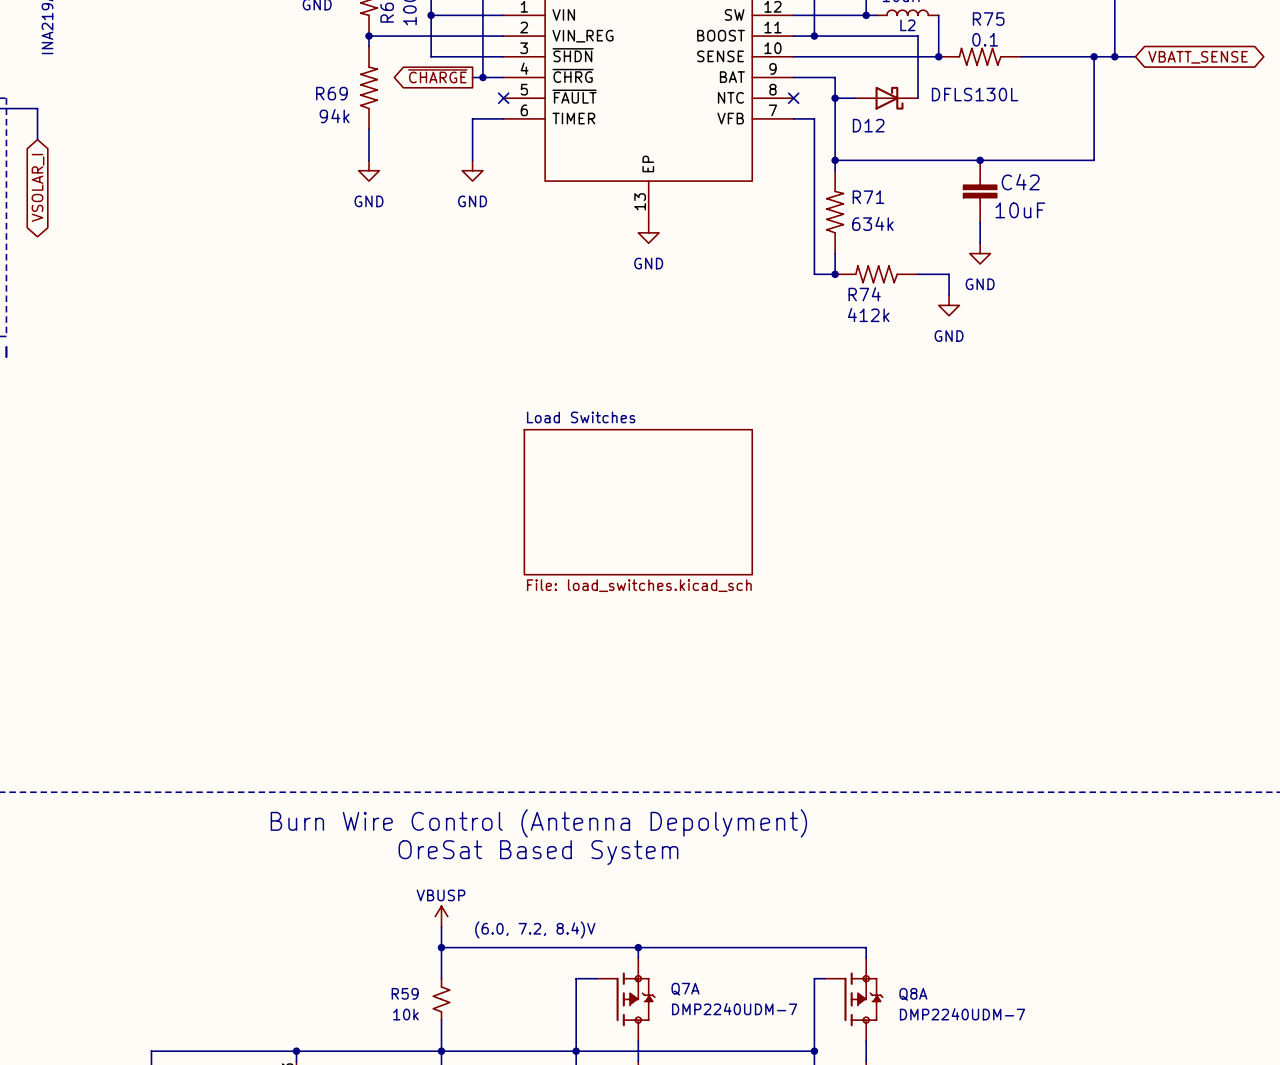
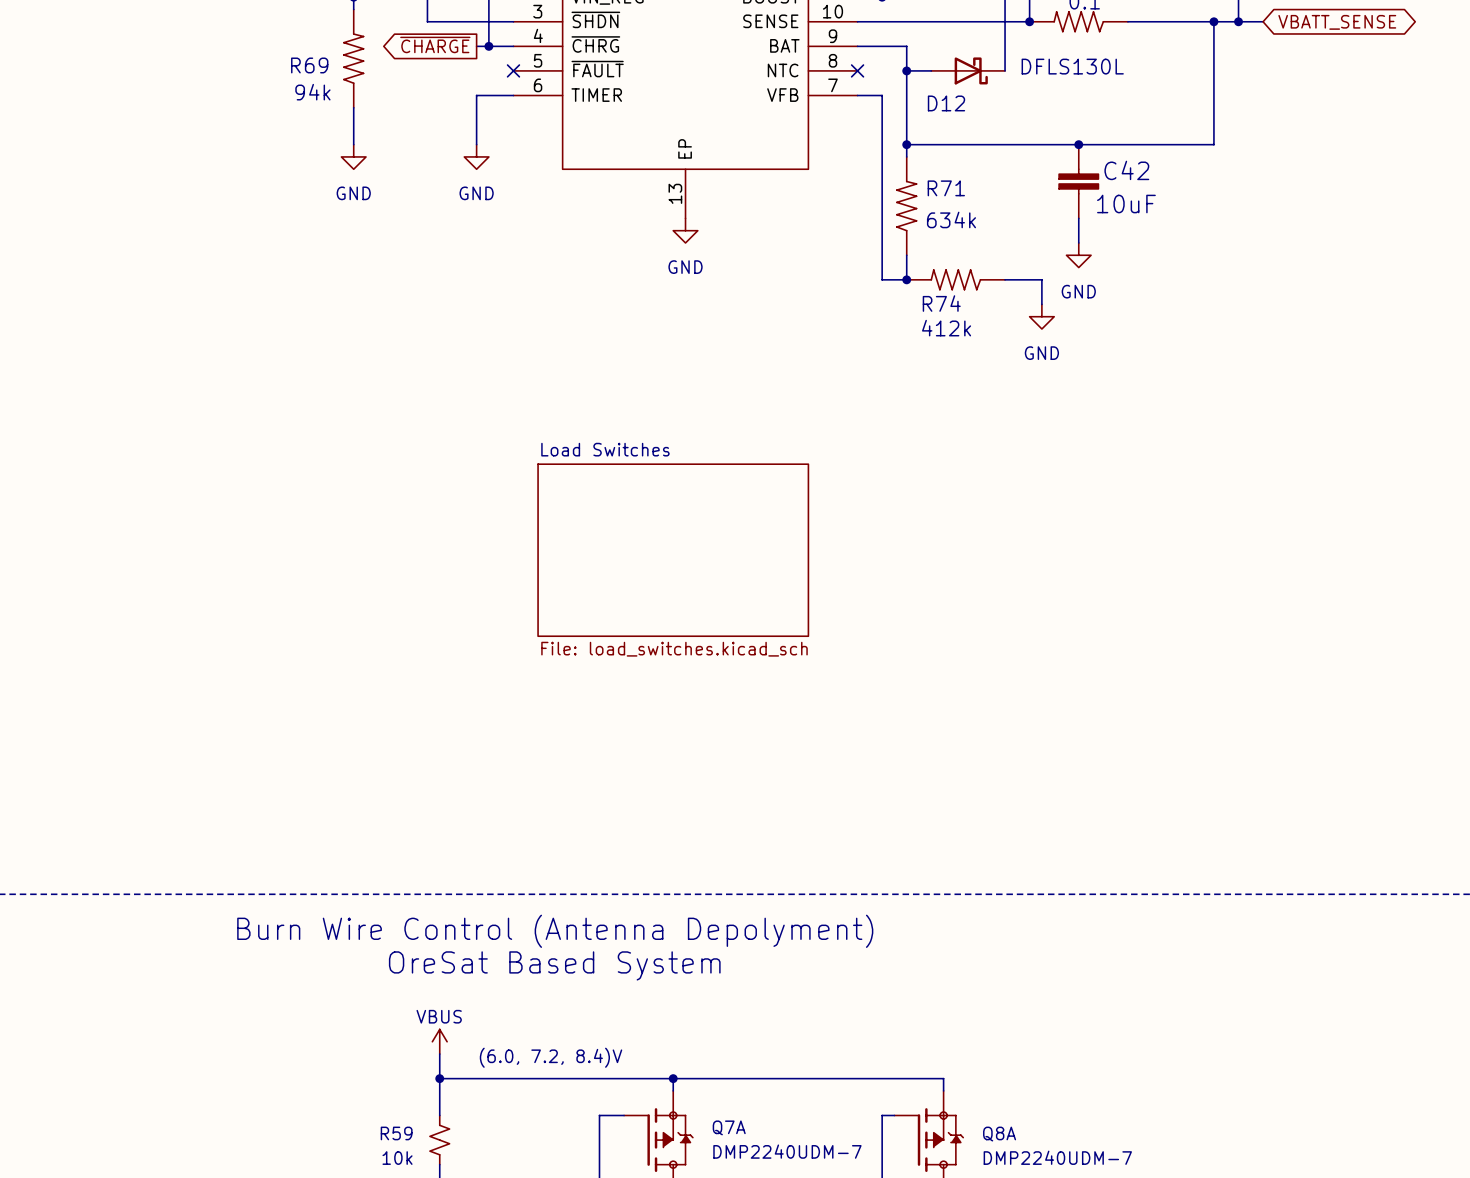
power symbol: VBUSP (441, 916) -> VBUS (439, 1041)

